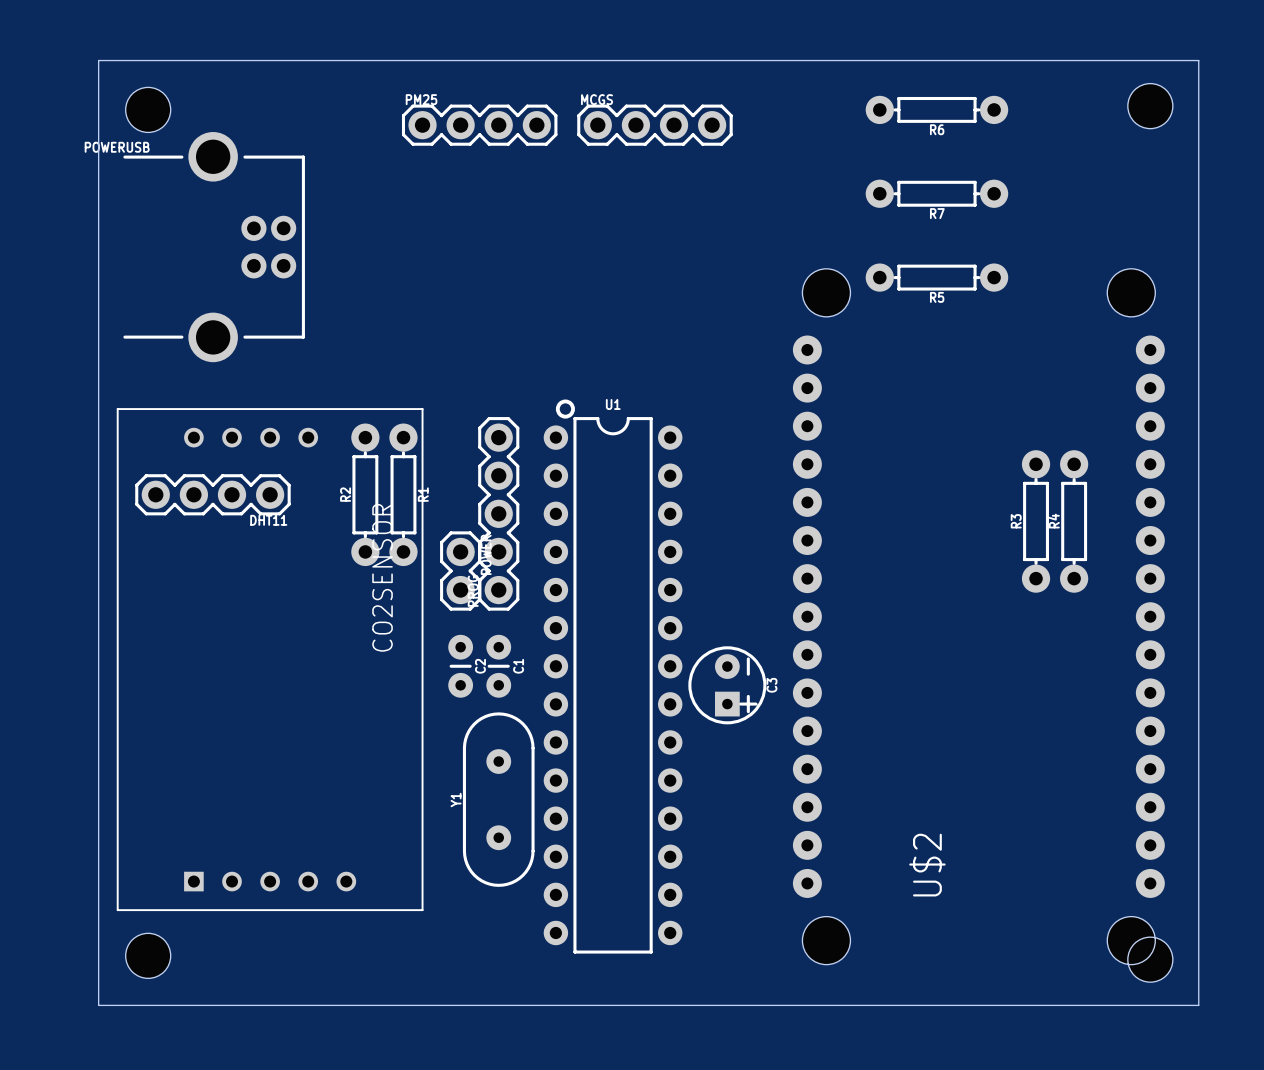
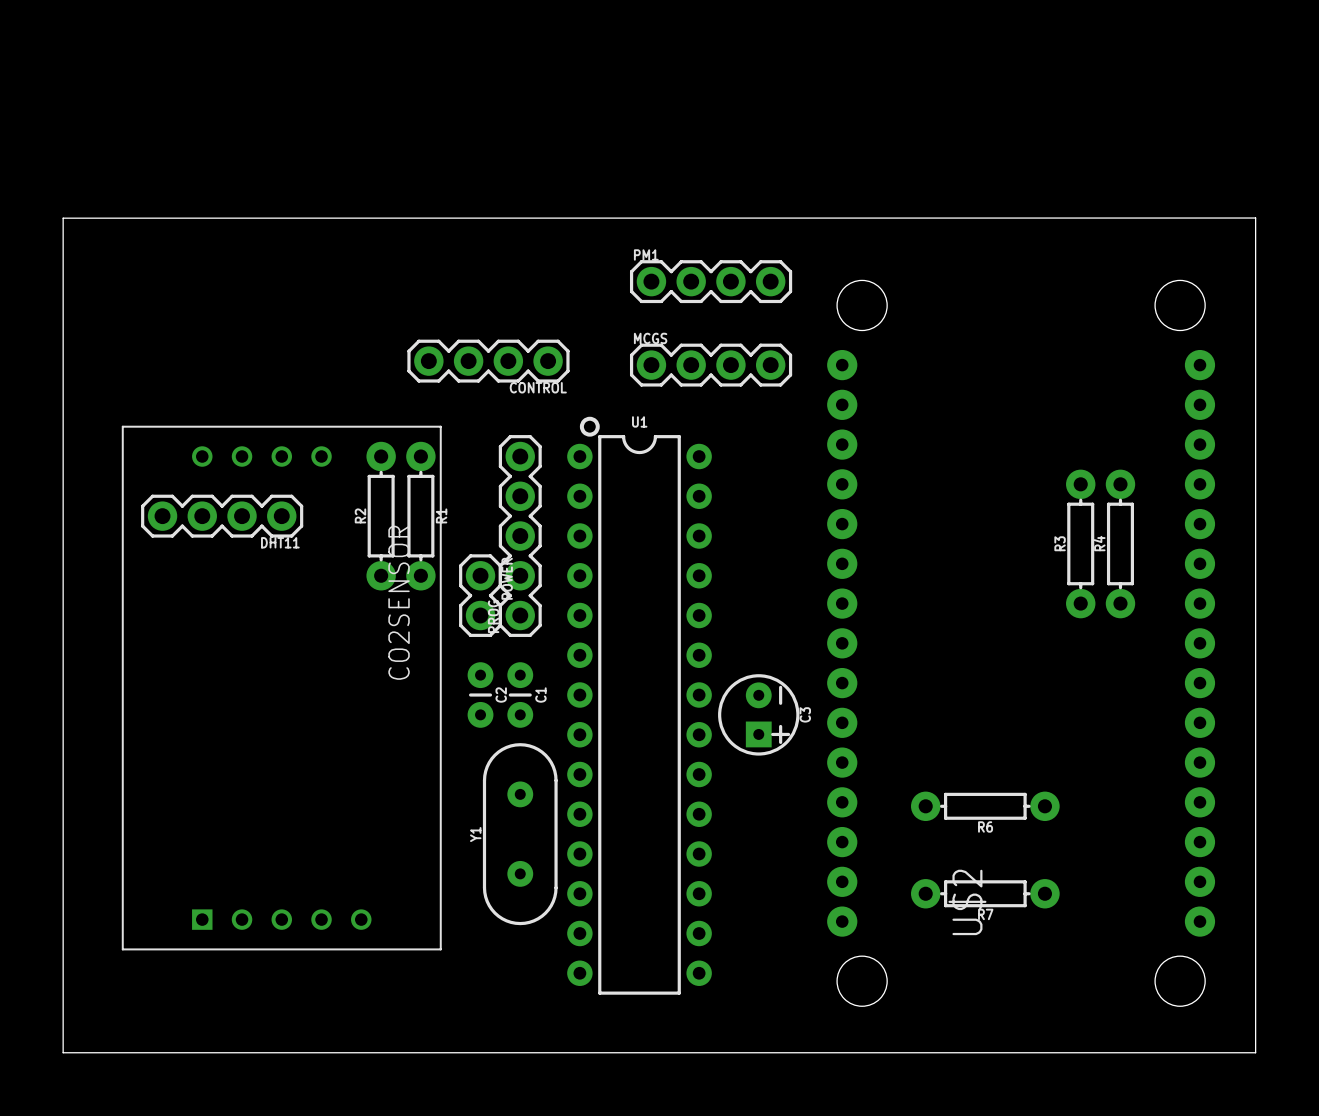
board edge: (98, 60) (1198, 60) (1198, 1005) (98, 1005) (98, 60) -> (1255, 218) (63, 218) (63, 1052) (1255, 1052) (1255, 218)
hole: (1150, 106) -> none
hole: (148, 109) -> none
R6 position: (936, 109) -> (985, 806)
PM25: (479, 125) -> none
MCGS position: (654, 125) -> (711, 365)
R7 position: (936, 193) -> (985, 893)
POWERUSB: (214, 247) -> none
PM1: none -> (711, 281)
R5: (936, 277) -> none
CONTROL: none -> (488, 361)
hole: (148, 955) -> none
hole: (1150, 959) -> none

